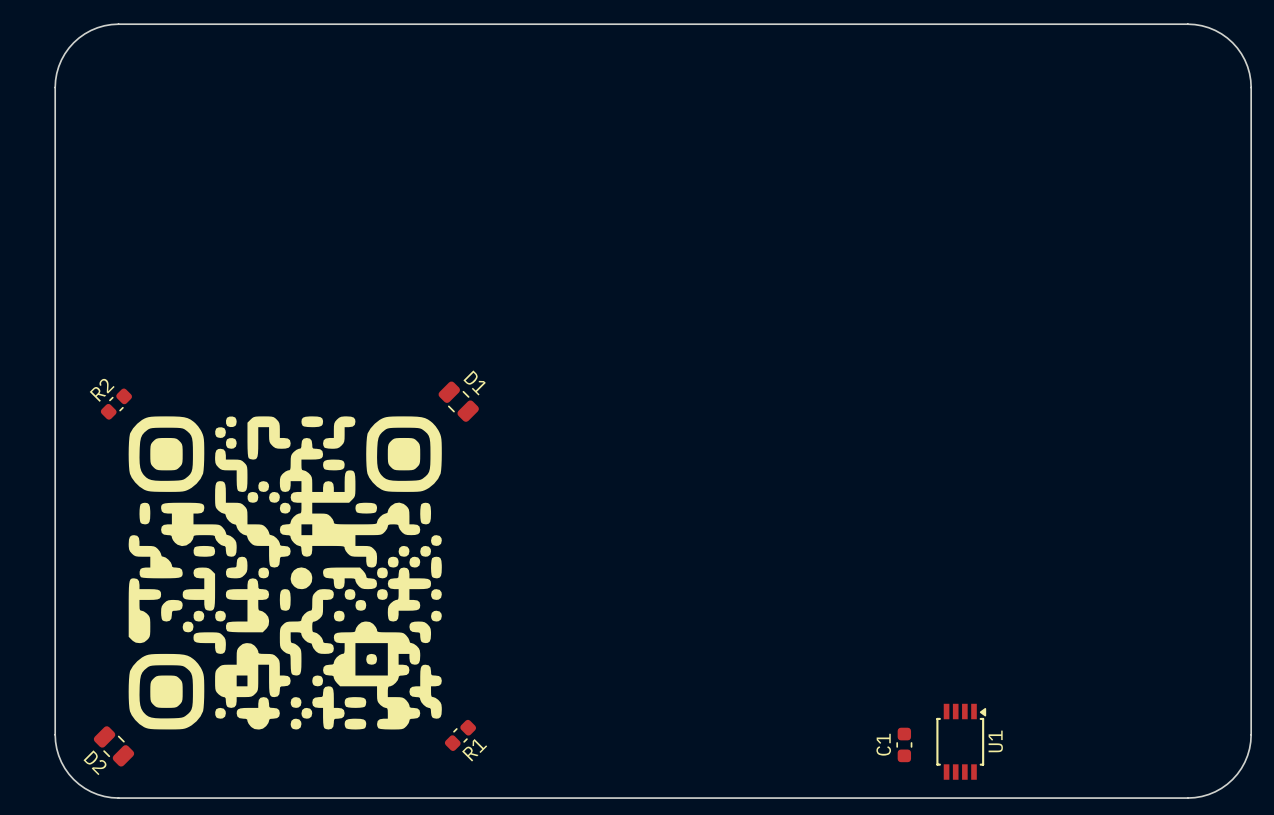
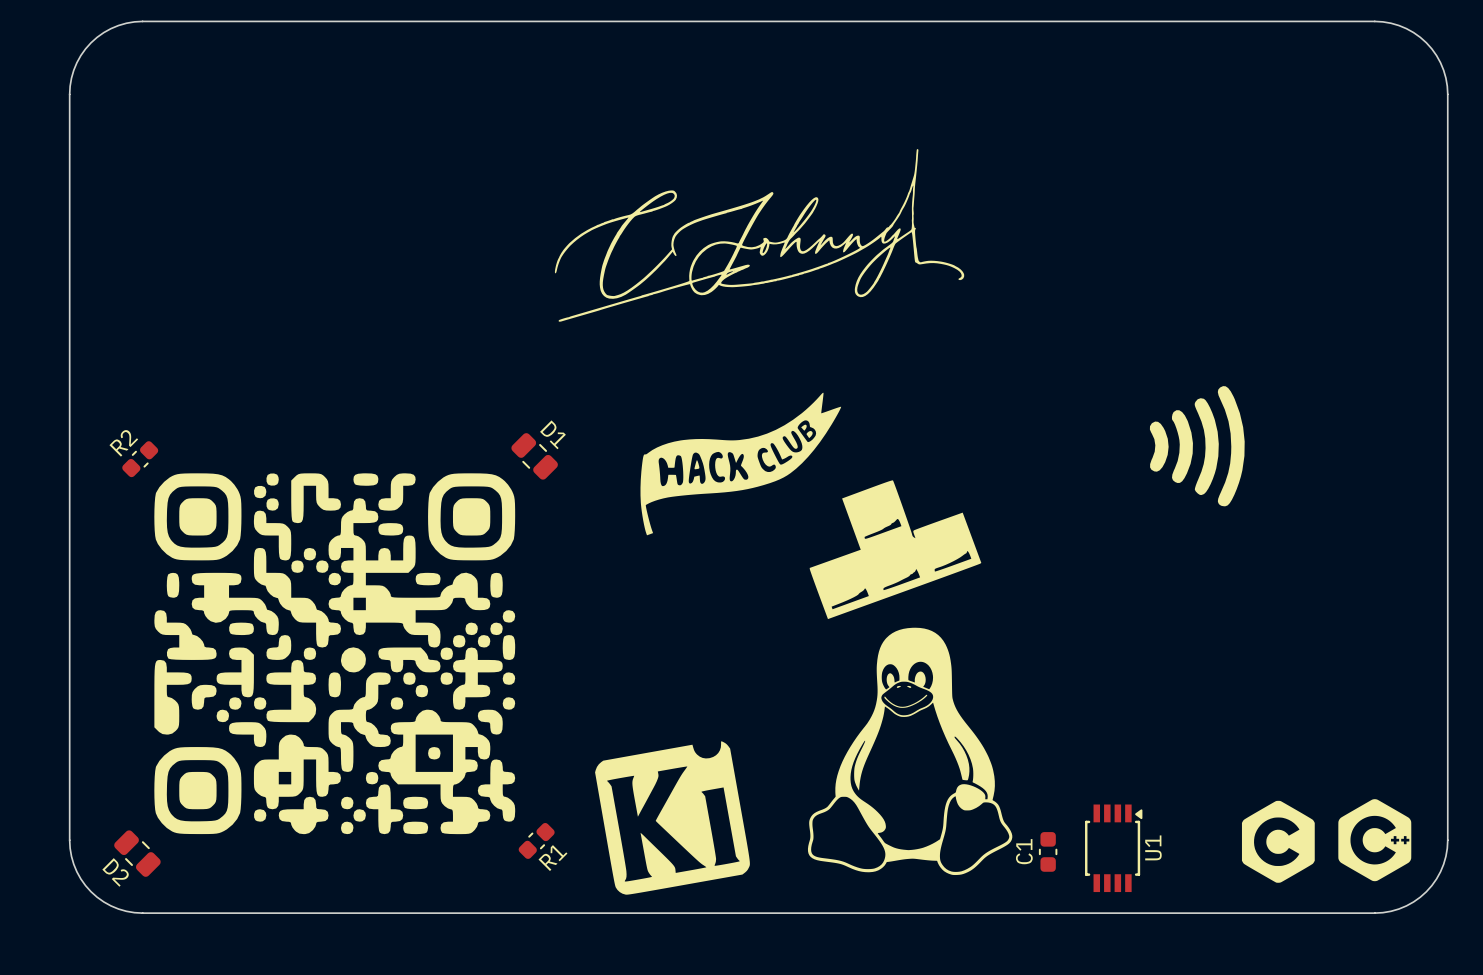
drawing: none -> [554, 149, 965, 322]
drawing: none -> [1149, 386, 1245, 507]
drawing: none -> [640, 392, 1013, 876]
drawing: none -> [595, 741, 750, 895]
drawing: none -> [1338, 799, 1412, 882]
drawing: none -> [1241, 800, 1315, 883]

